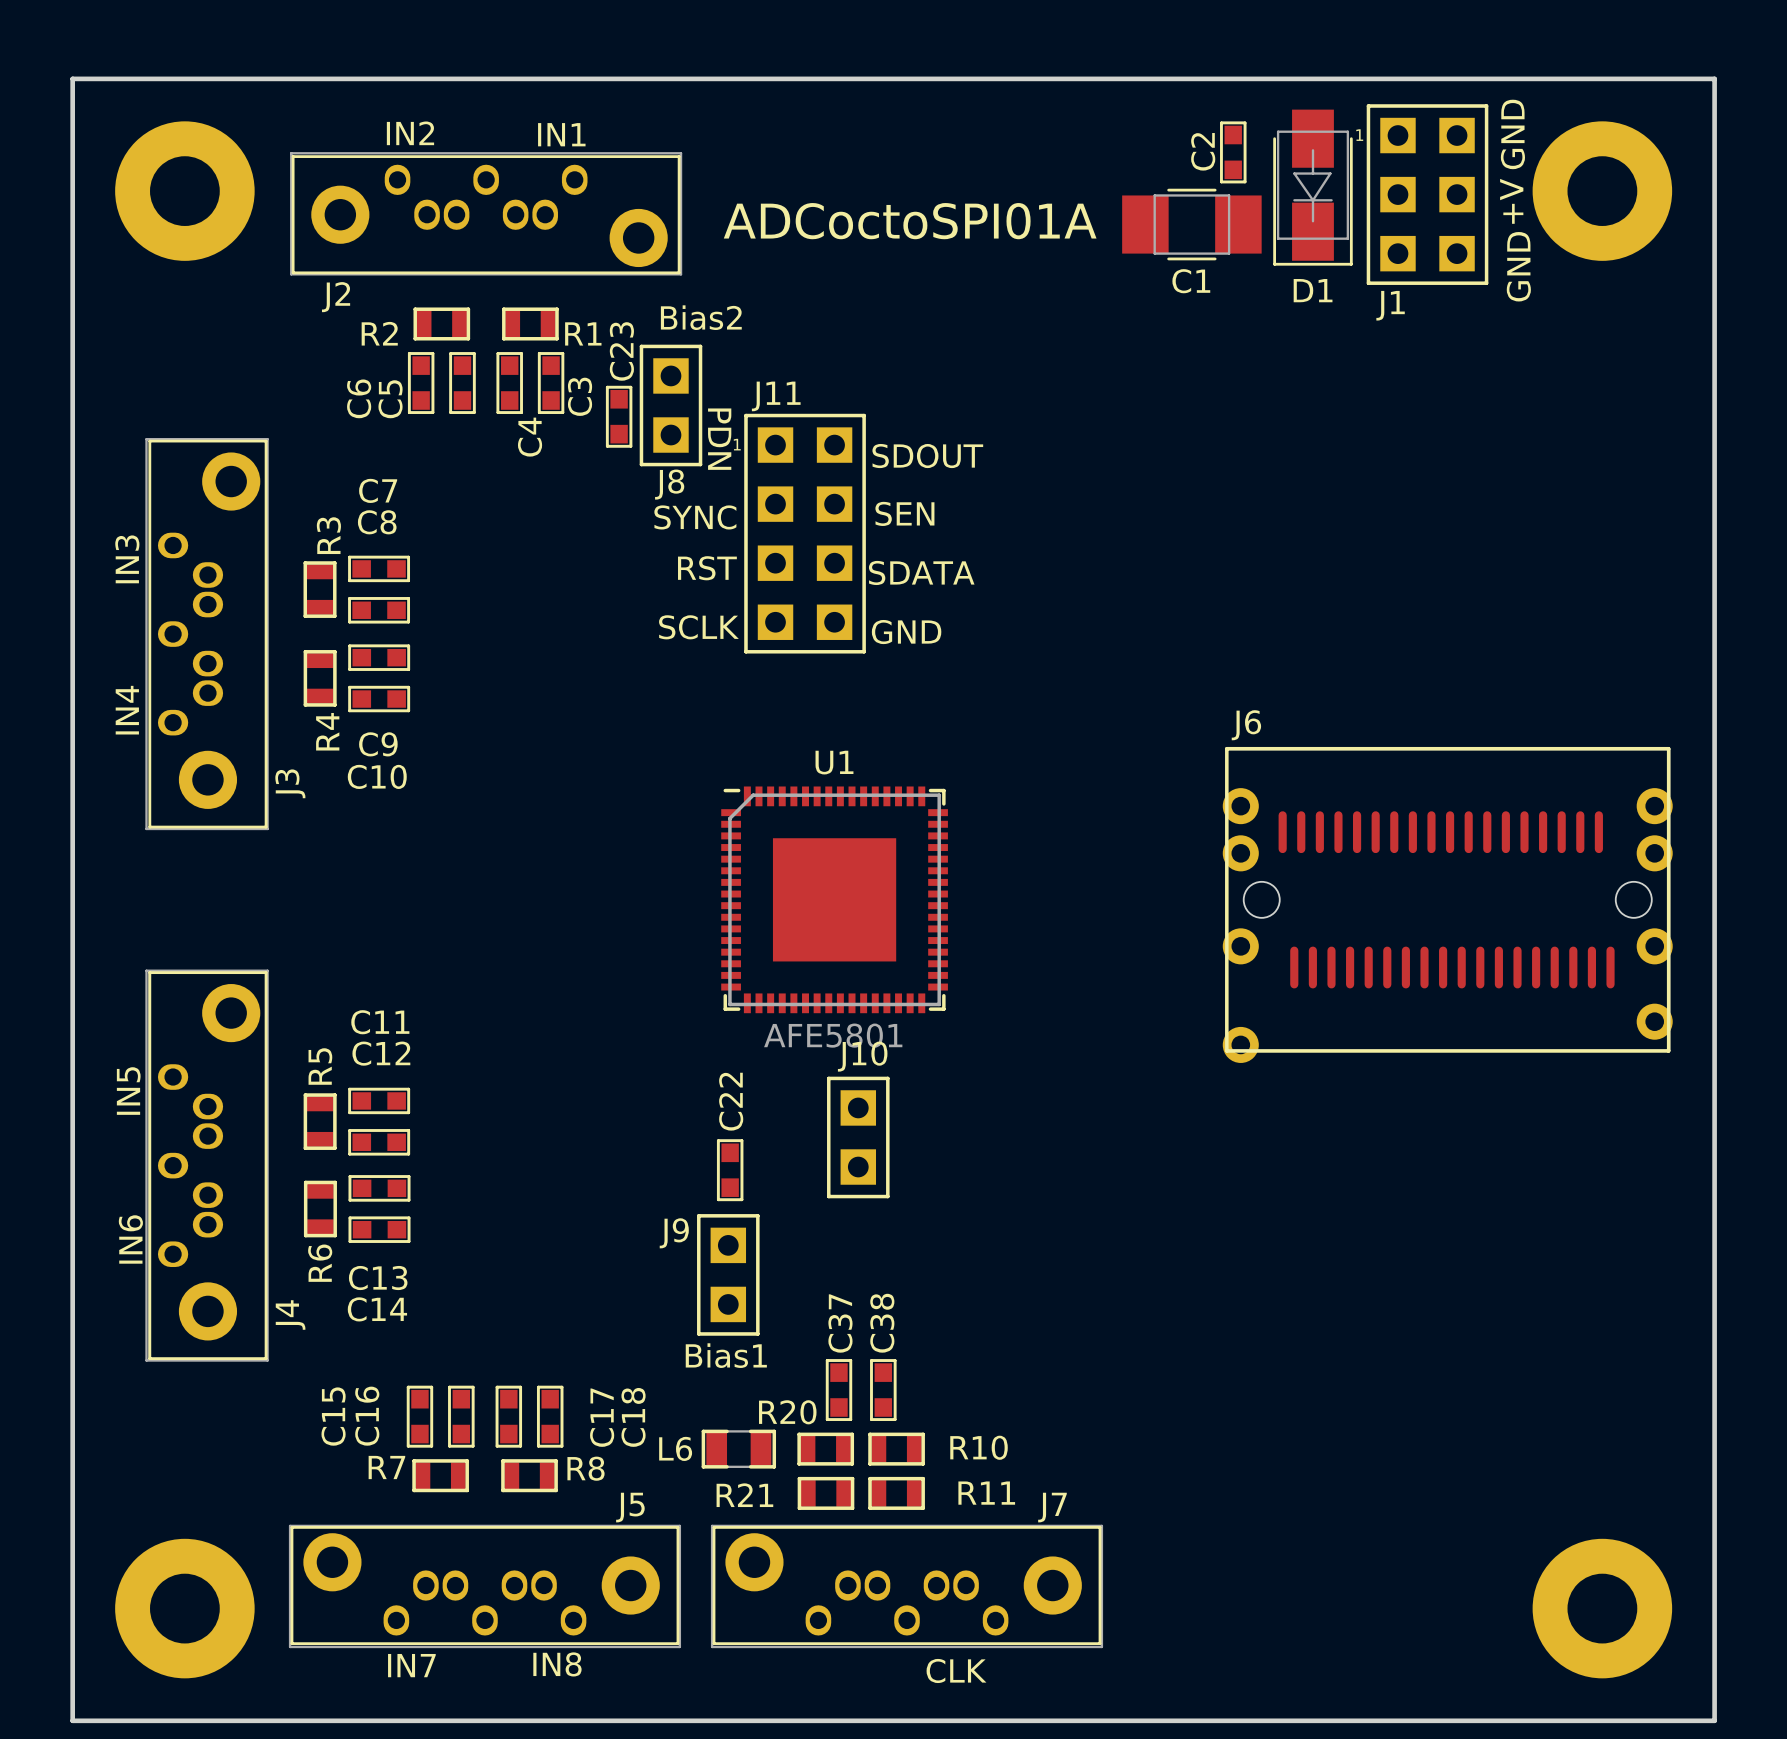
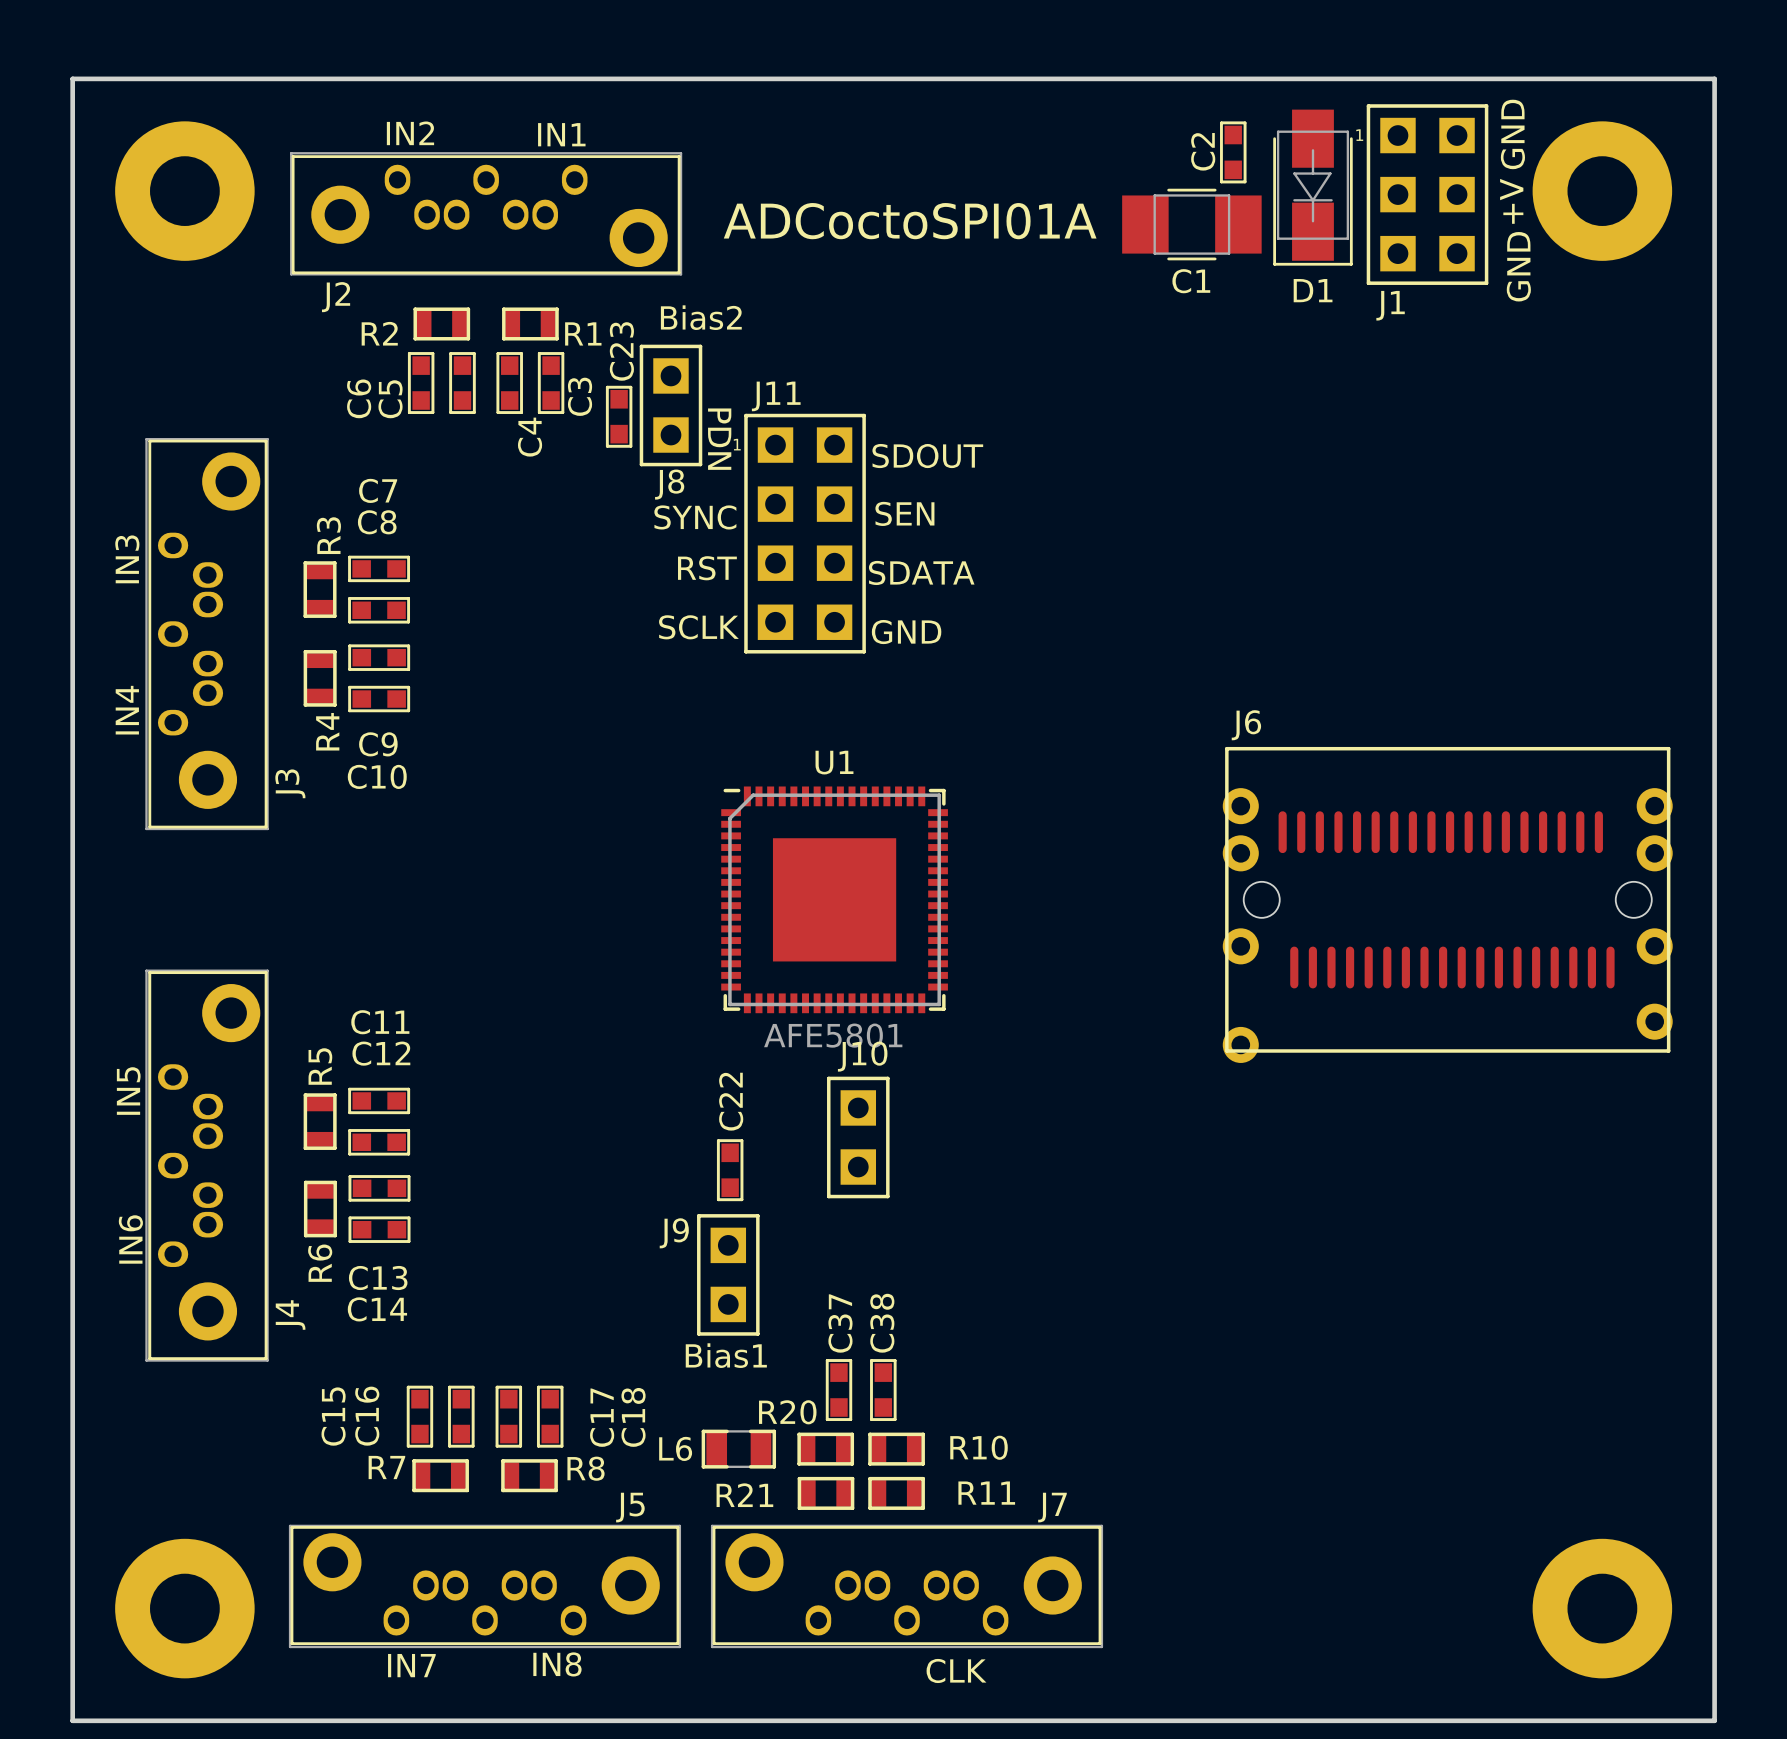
J6 footprint: [1222, 746, 1673, 1063] -> [1222, 746, 1673, 1063]

